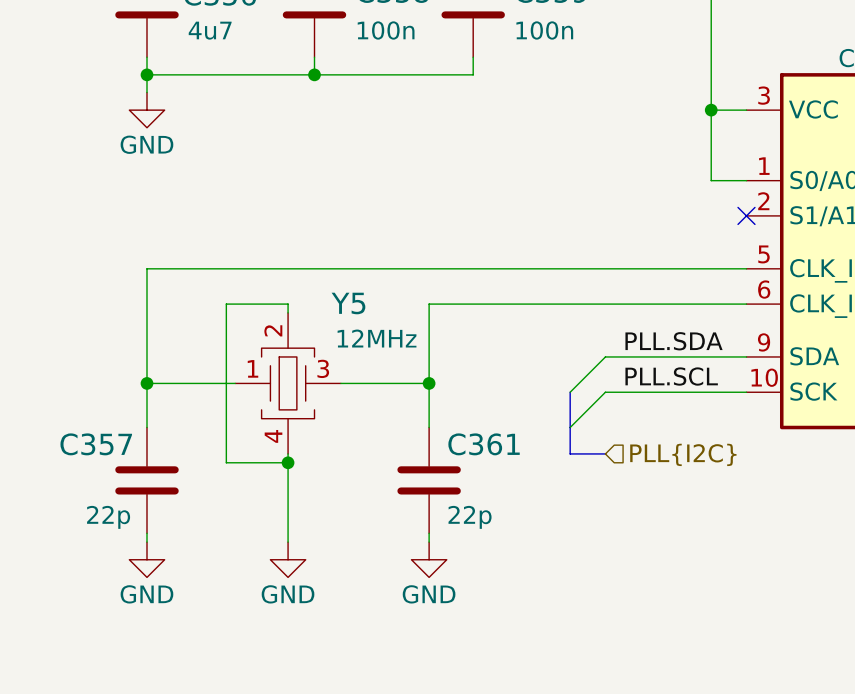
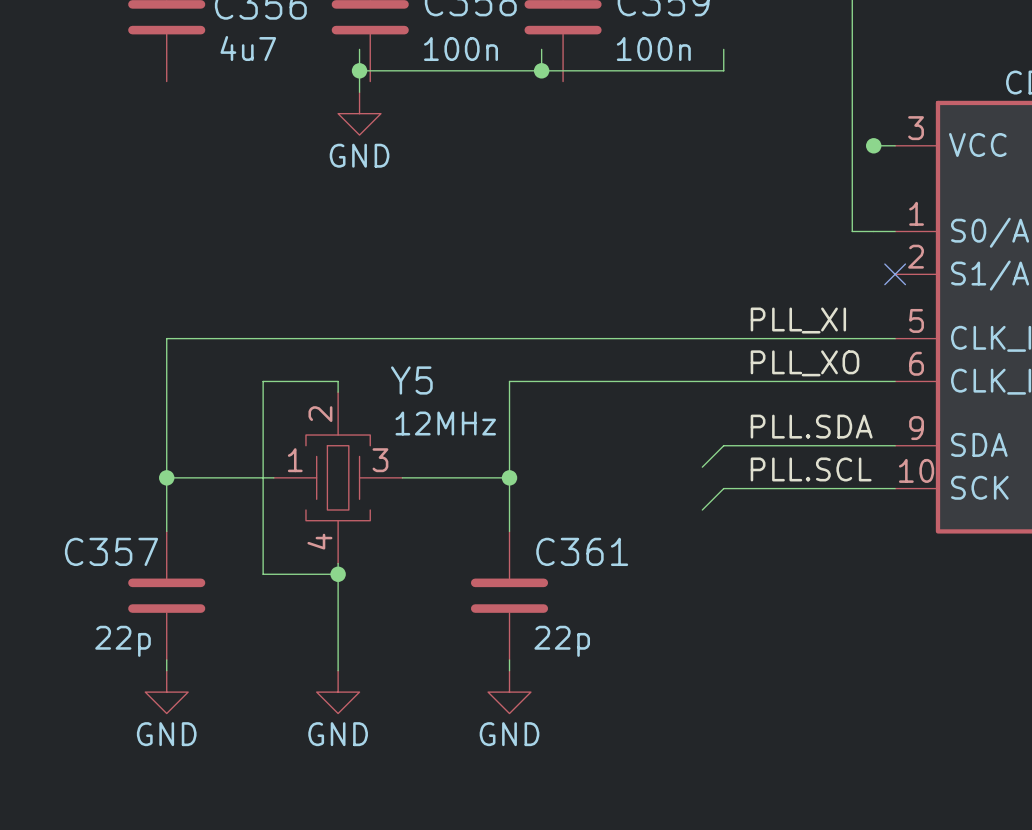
wire: none -> (723, 49) (723, 70) (359, 70)
junction: none -> (541, 70)
wire: (146, 57) (146, 92) -> (359, 49) (359, 92)
wire: (314, 57) (314, 74) -> (541, 49) (541, 70)
wire: (473, 57) (473, 74) (146, 74) -> none
junction: (146, 74) -> none
junction position: (314, 74) -> (359, 70)
power symbol position: GND (146, 110) -> GND (359, 113)
wire: (711, 110) (728, 110) -> none
junction position: (711, 110) -> (873, 145)
label: none -> PLL_XI (798, 320)
label: none -> PLL_XO (805, 363)
wire: (587, 374) (570, 392) -> none
bus: (570, 392) (570, 453) (605, 453) -> none
wire: (587, 409) (570, 427) -> none
hierarchical label: PLL{I2C} (683, 454) -> none

